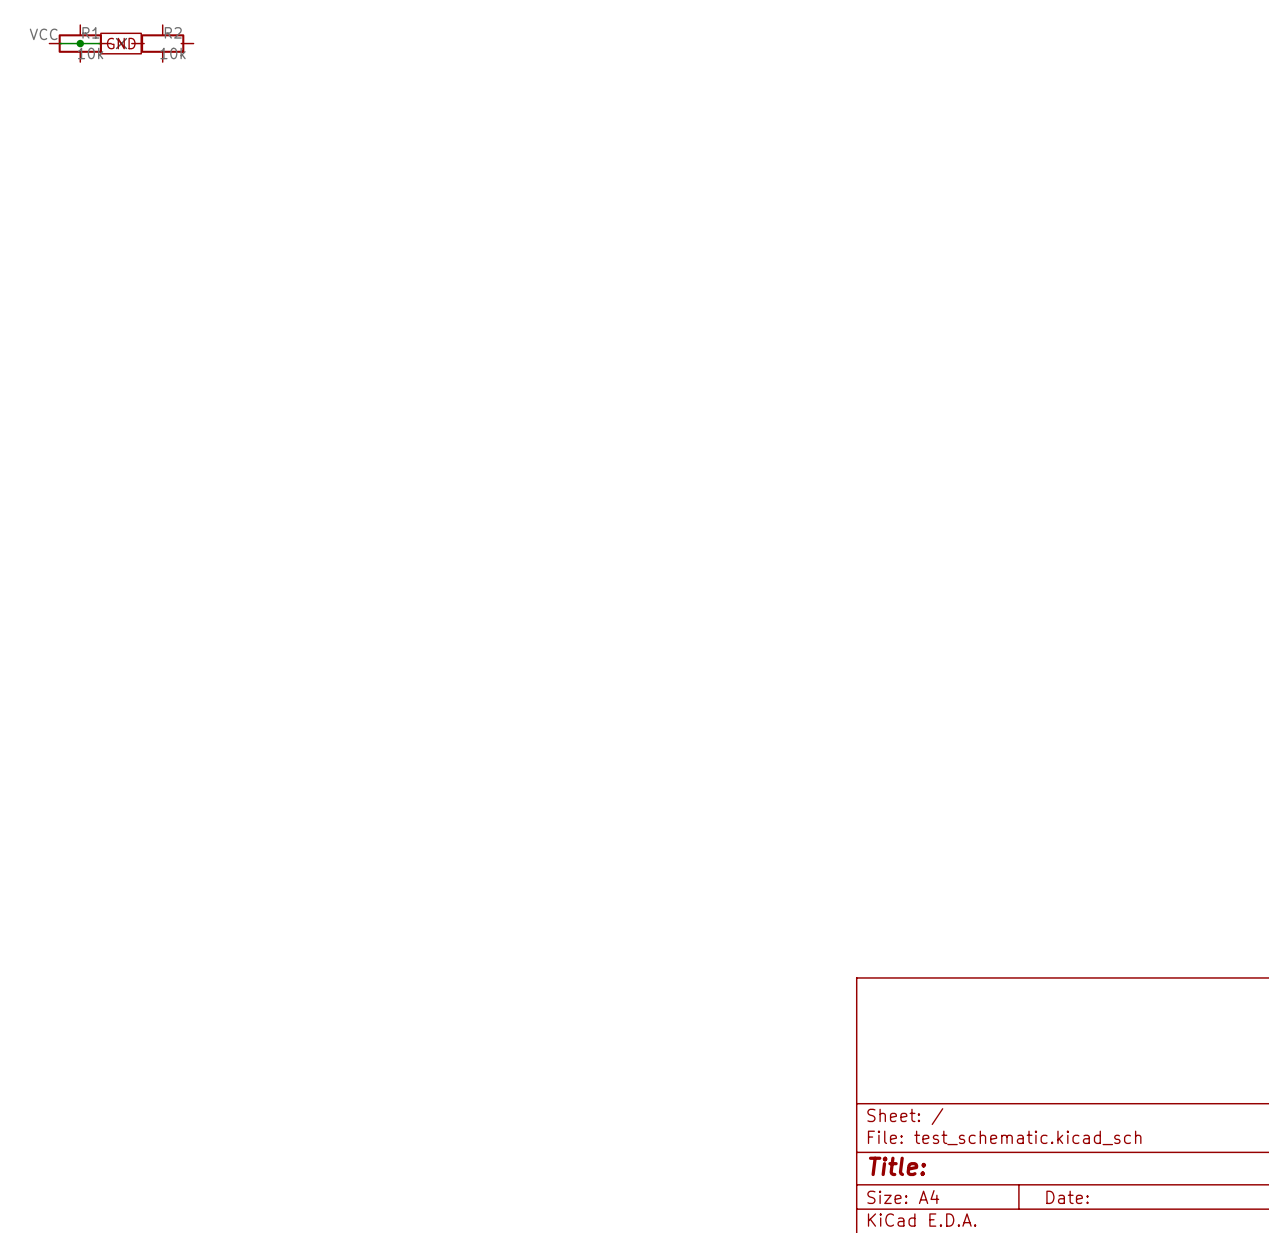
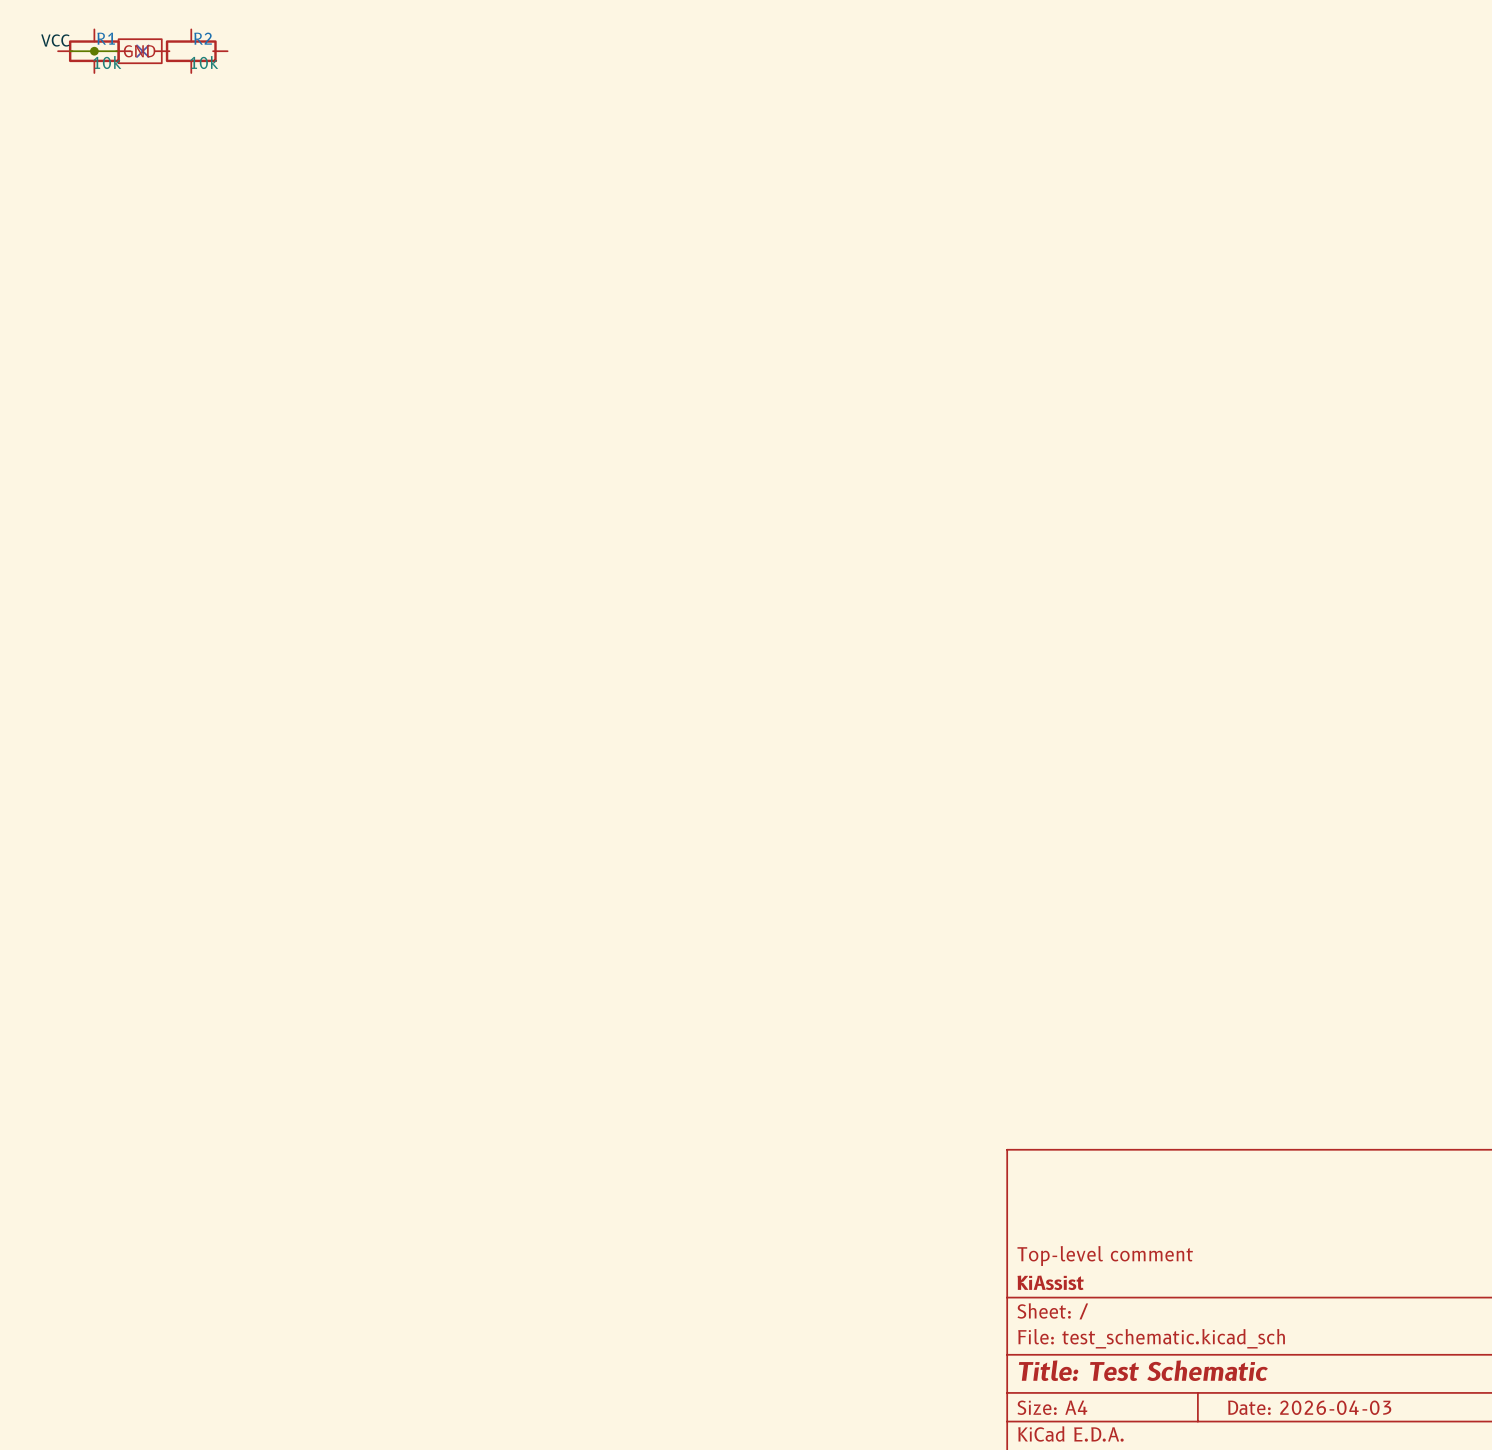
title block: none -> Top-level comment (1105, 1256)
title block: none -> KiAssist (1050, 1282)
title block: Title: (897, 1166) -> Title: Test Schematic (1143, 1370)
title block: Date: (1067, 1197) -> Date: 2026-04-03 (1309, 1407)

